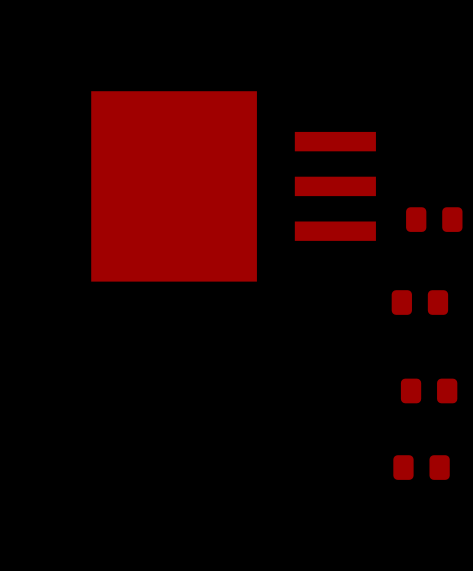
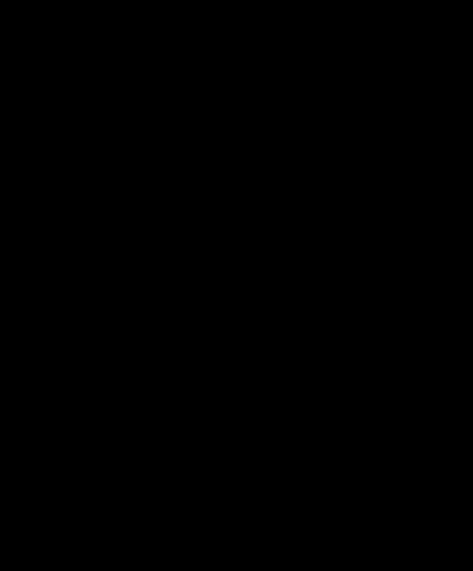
part: (233, 186) -> none
part: (434, 219) -> none
part: (419, 302) -> none
part: (429, 390) -> none
part: (421, 467) -> none

